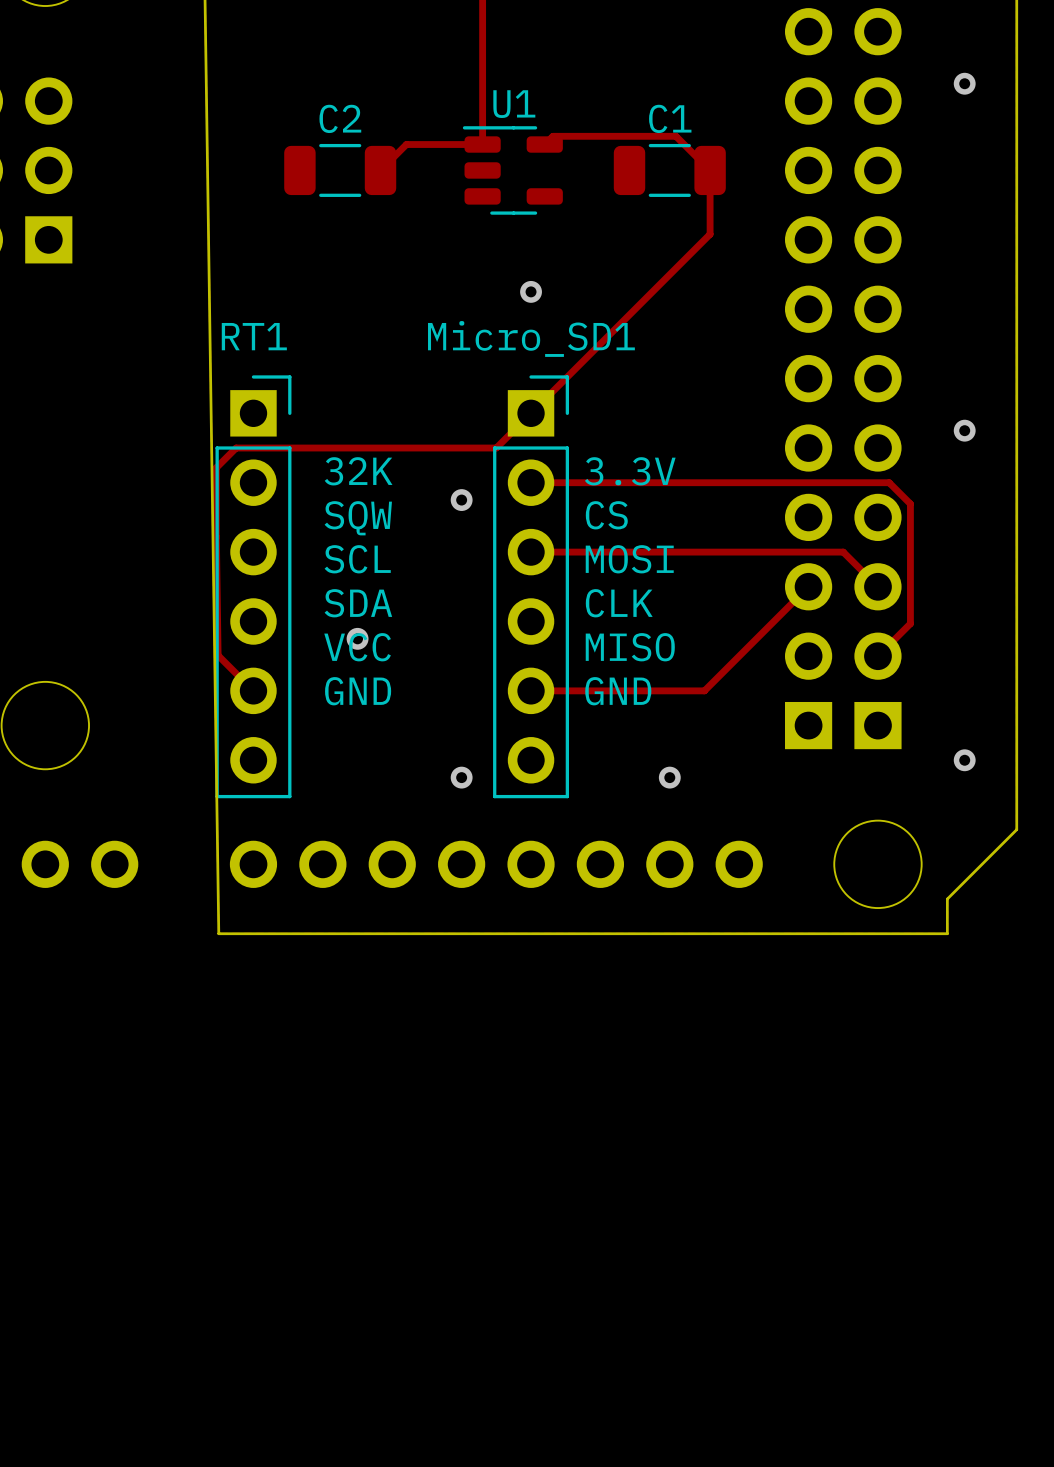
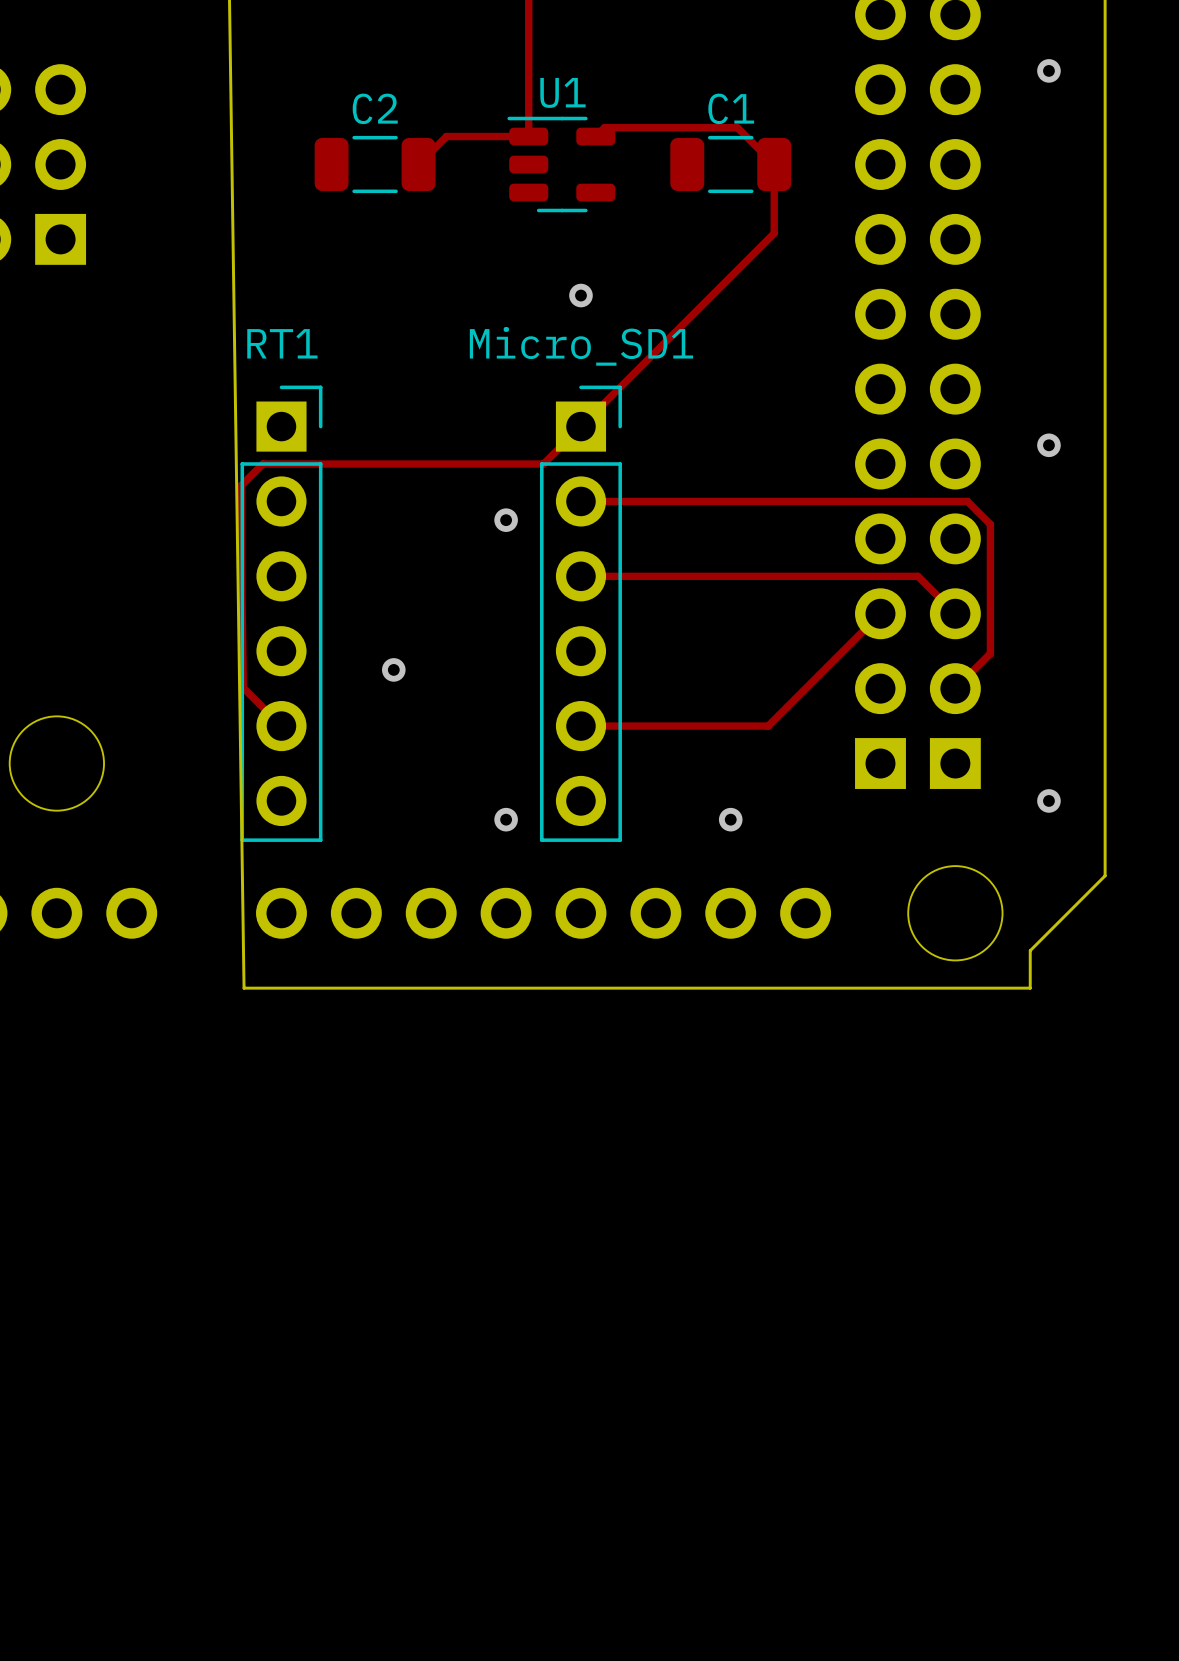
text: 32K (358, 471) -> none
text: 3.3V (630, 471) -> none
text: CS (606, 515) -> none
text: SQW (358, 518) -> none
text: SCL (357, 559) -> none
text: MOSI (629, 559) -> none
text: SDA (358, 603) -> none
text: CLK (619, 603) -> none
text: VCC (357, 647) -> none
text: MISO (630, 647) -> none
text: GND (358, 691) -> none
text: GND (618, 691) -> none

